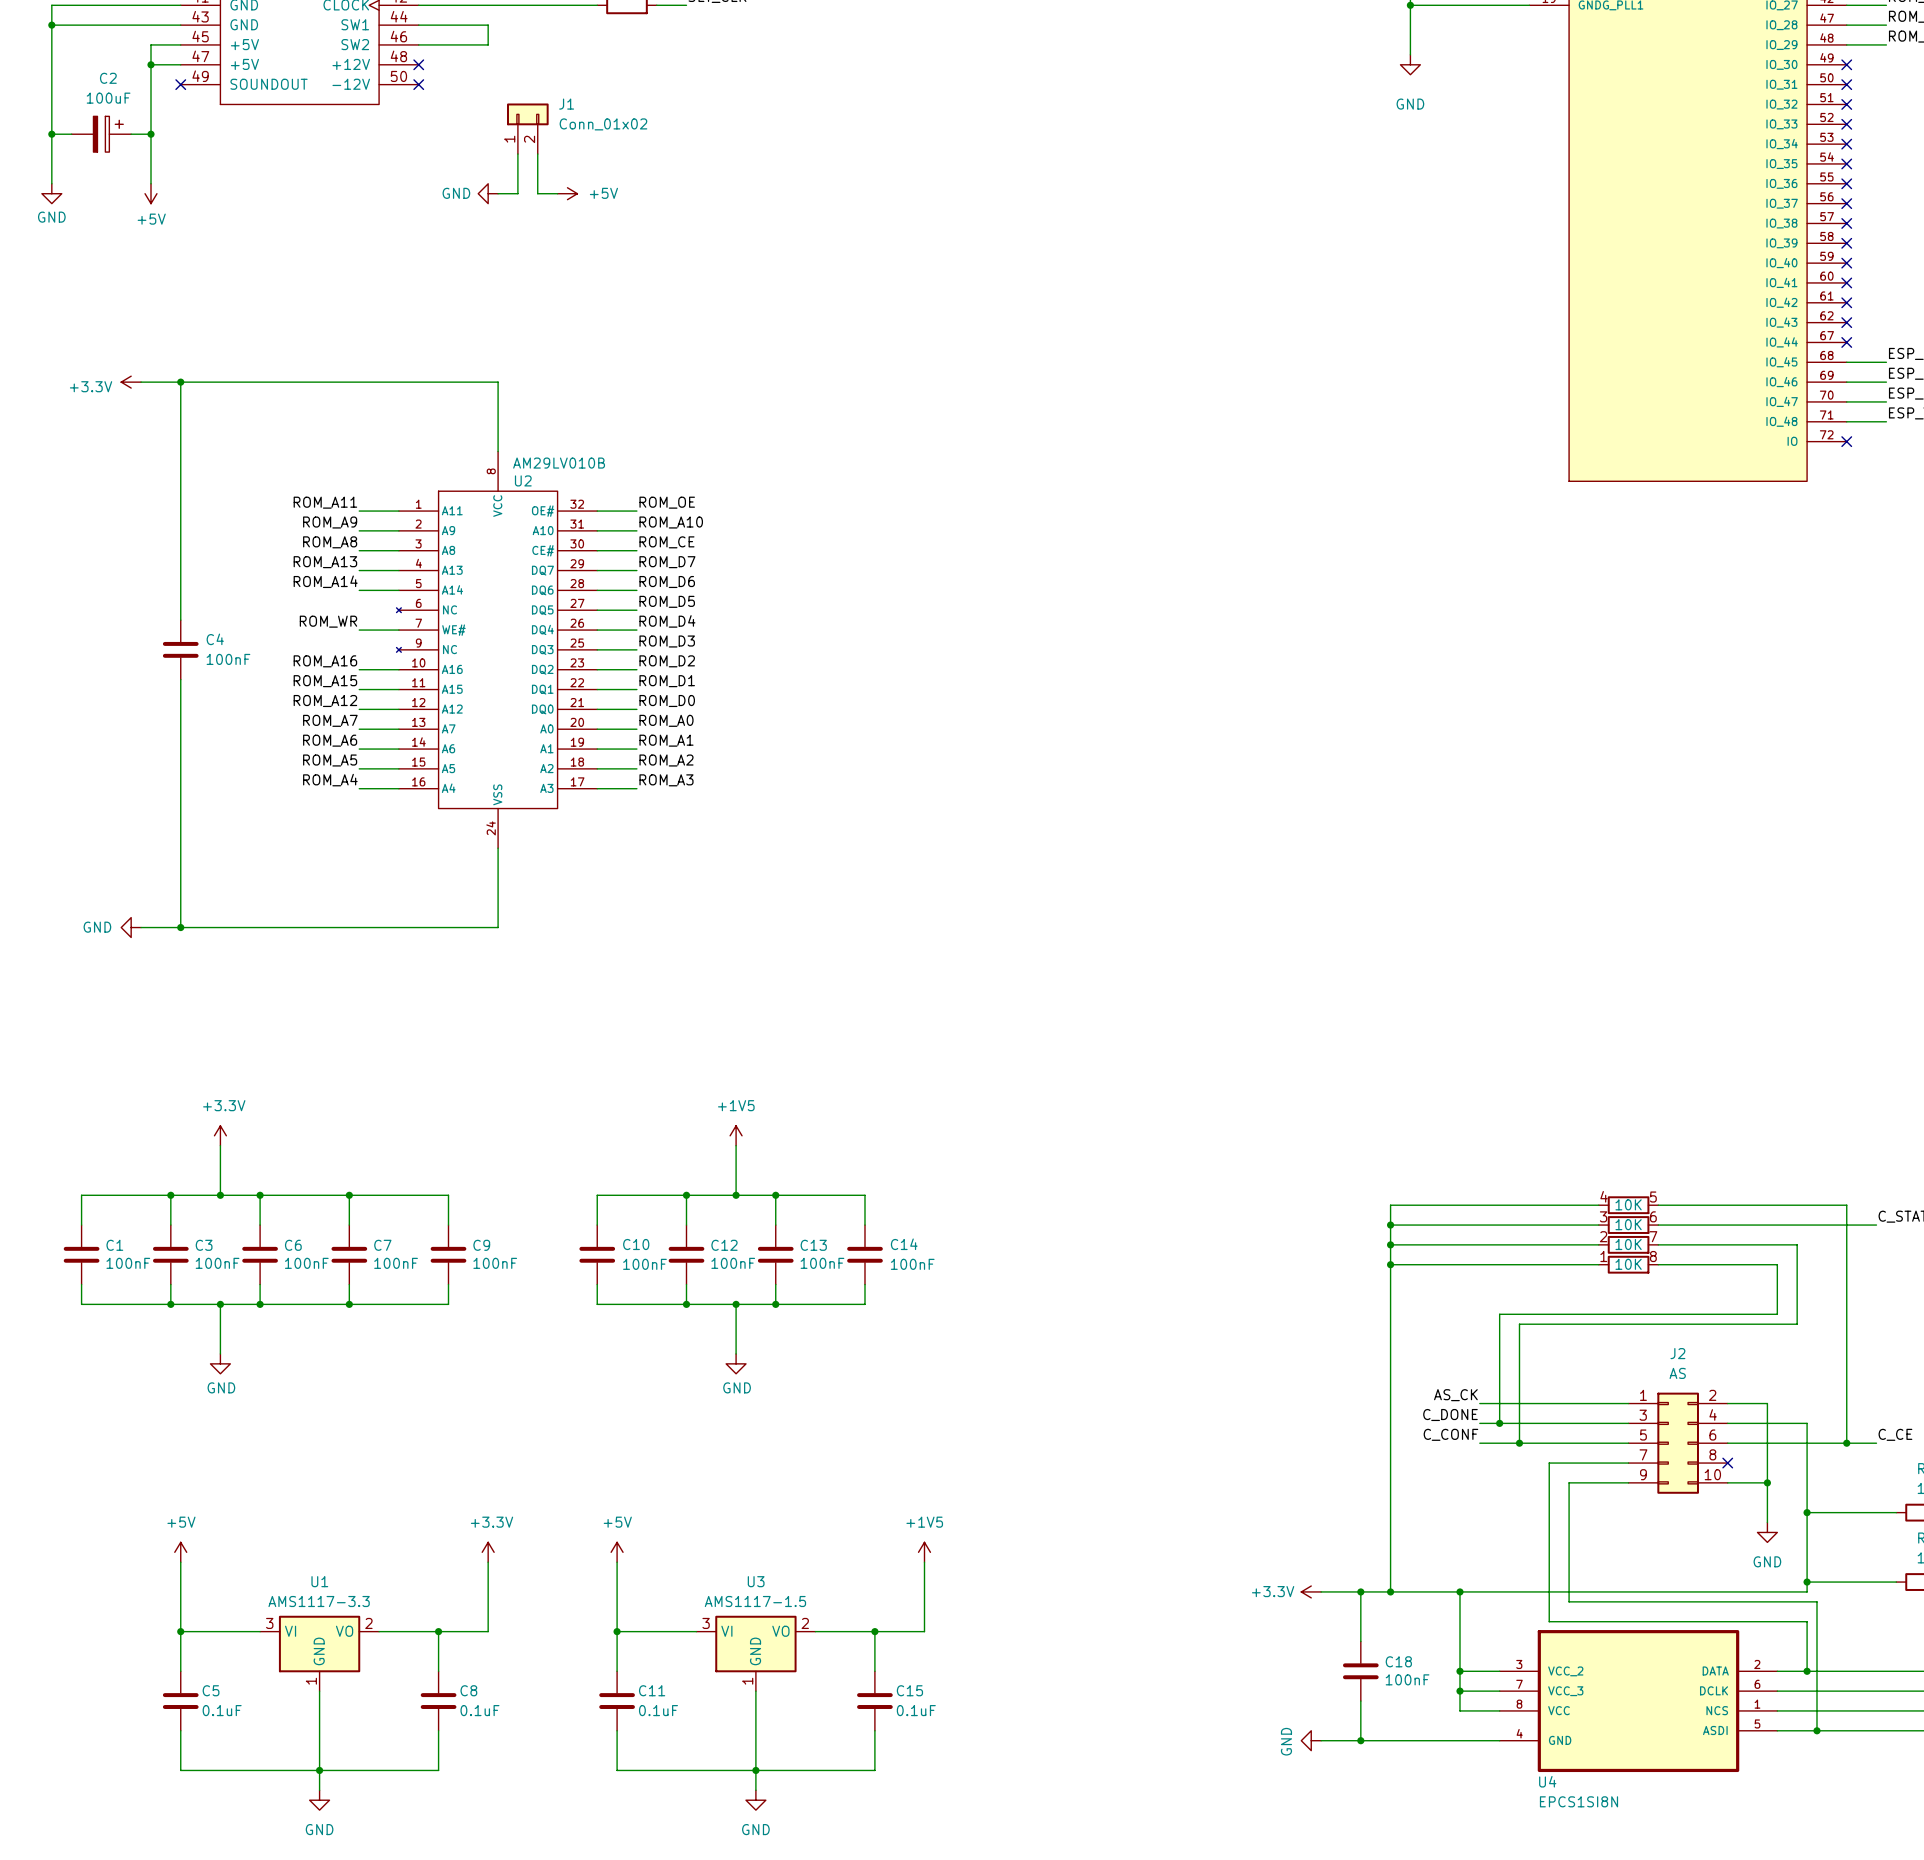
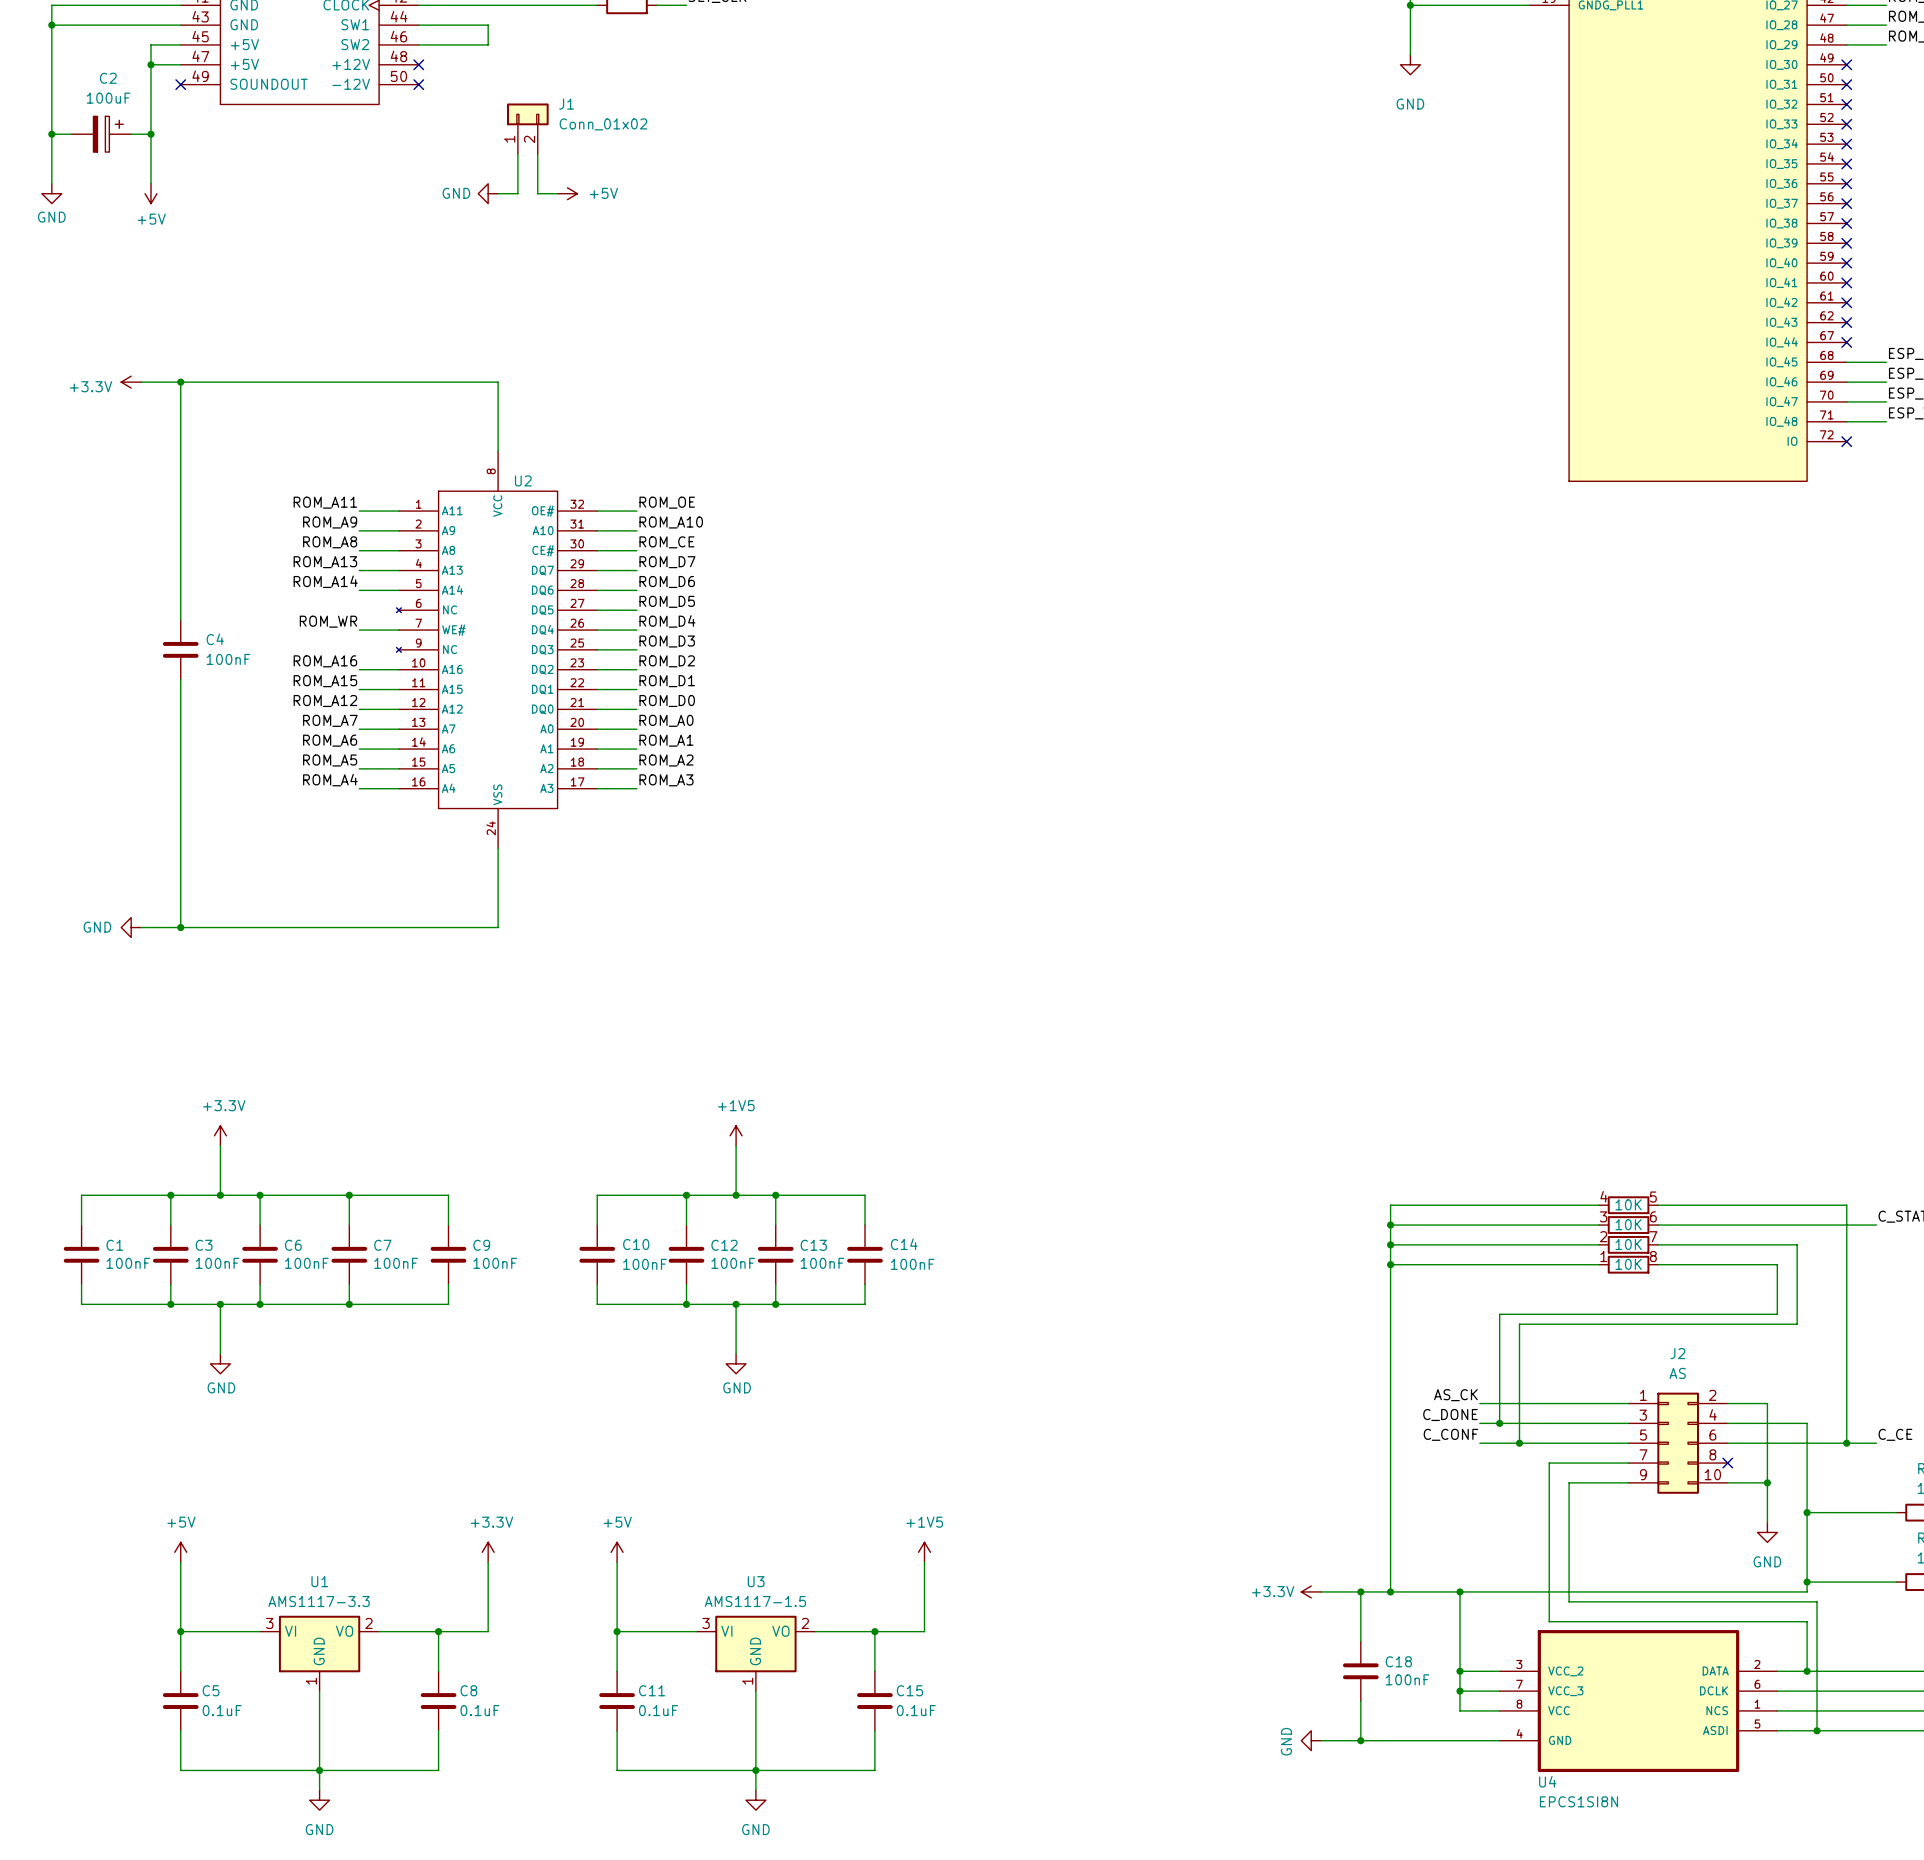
U2 value: AM29LV010B (559, 463) -> none

